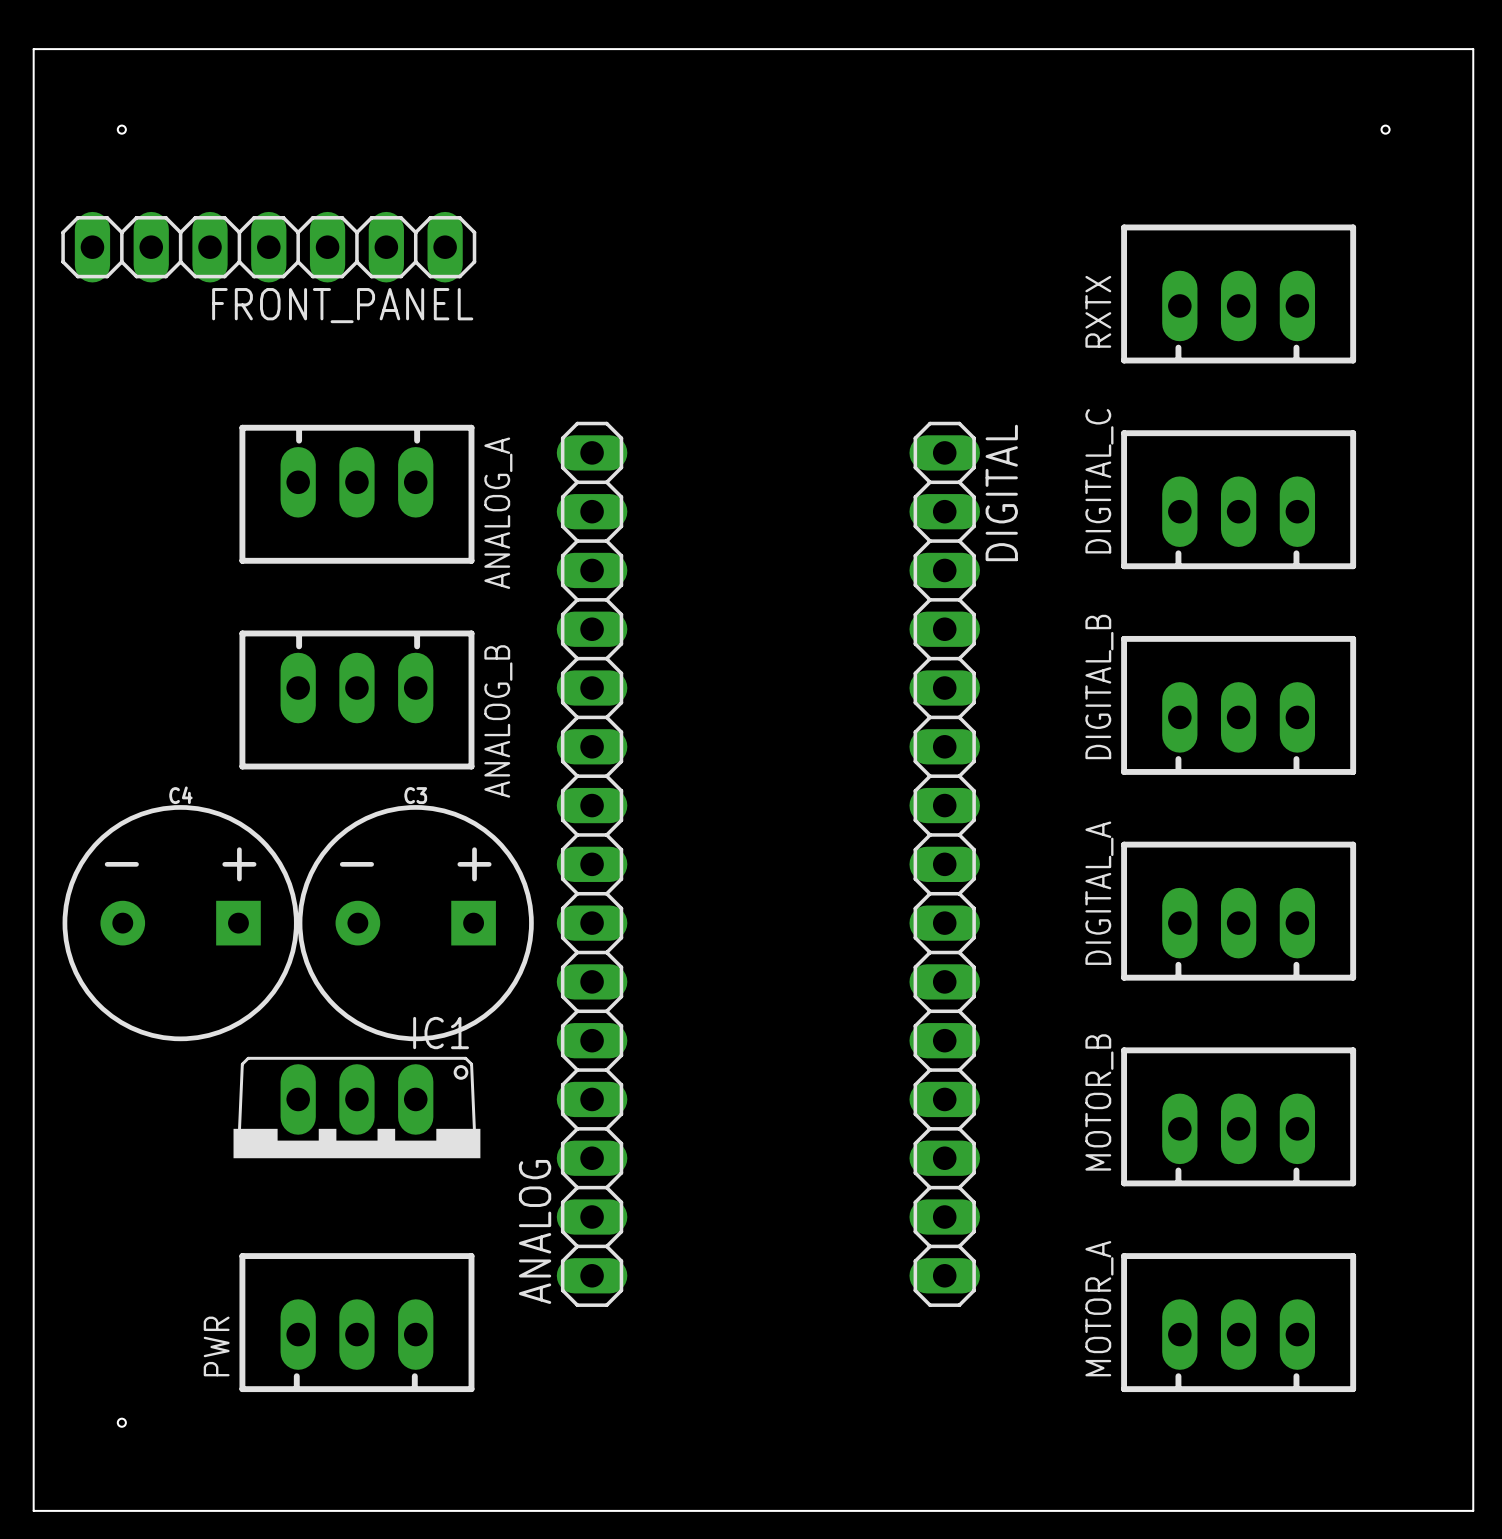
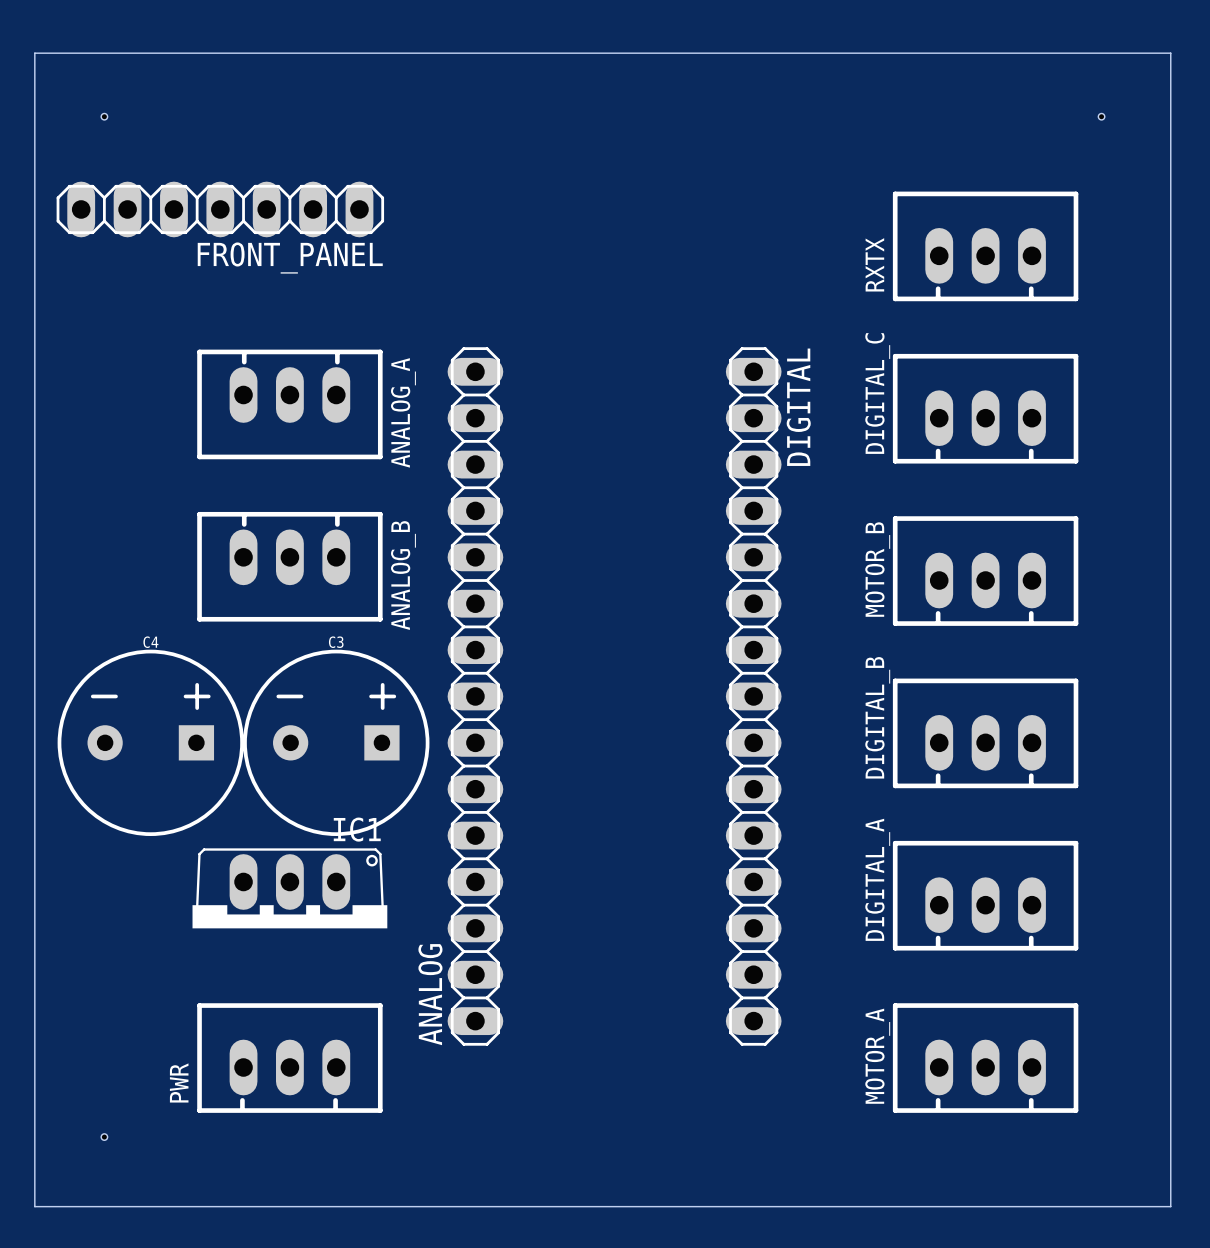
DIGITAL_B name: DIGITAL_B (1099, 686) -> MOTOR_B (877, 569)
DIGITAL_A name: DIGITAL_A (1099, 893) -> DIGITAL_B (877, 717)
MOTOR_B name: MOTOR_B (1099, 1102) -> DIGITAL_A (877, 879)

